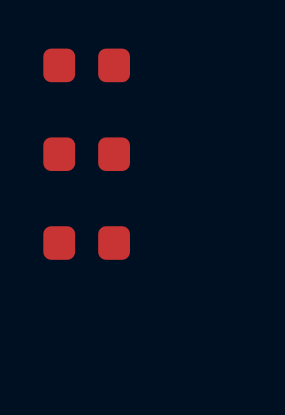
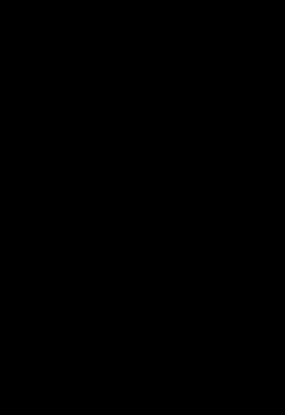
part: (86, 65) -> none
part: (86, 154) -> none
part: (86, 243) -> none

